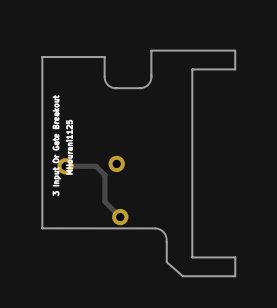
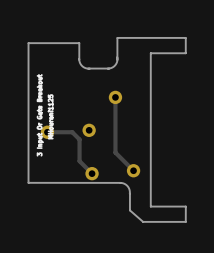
track: none -> (115, 97) (115, 152) (133, 170)
via: none -> (115, 97)
via: none -> (133, 170)

